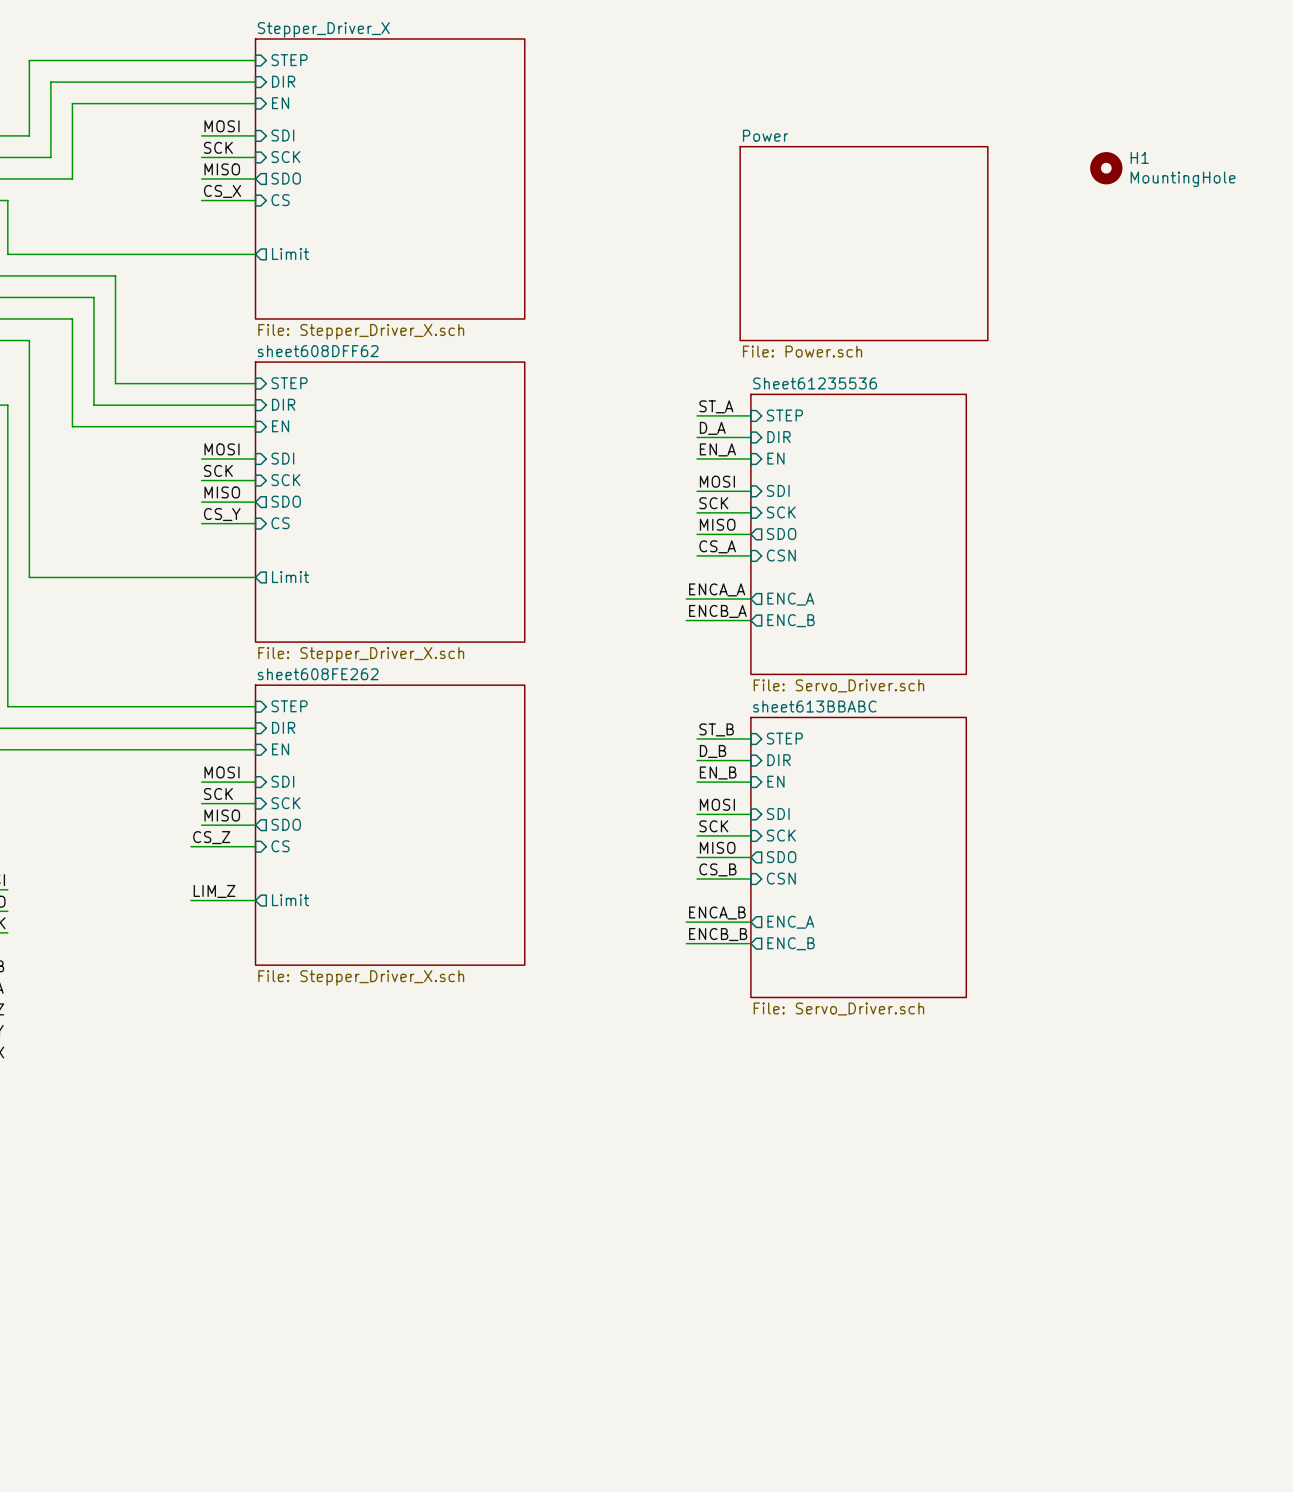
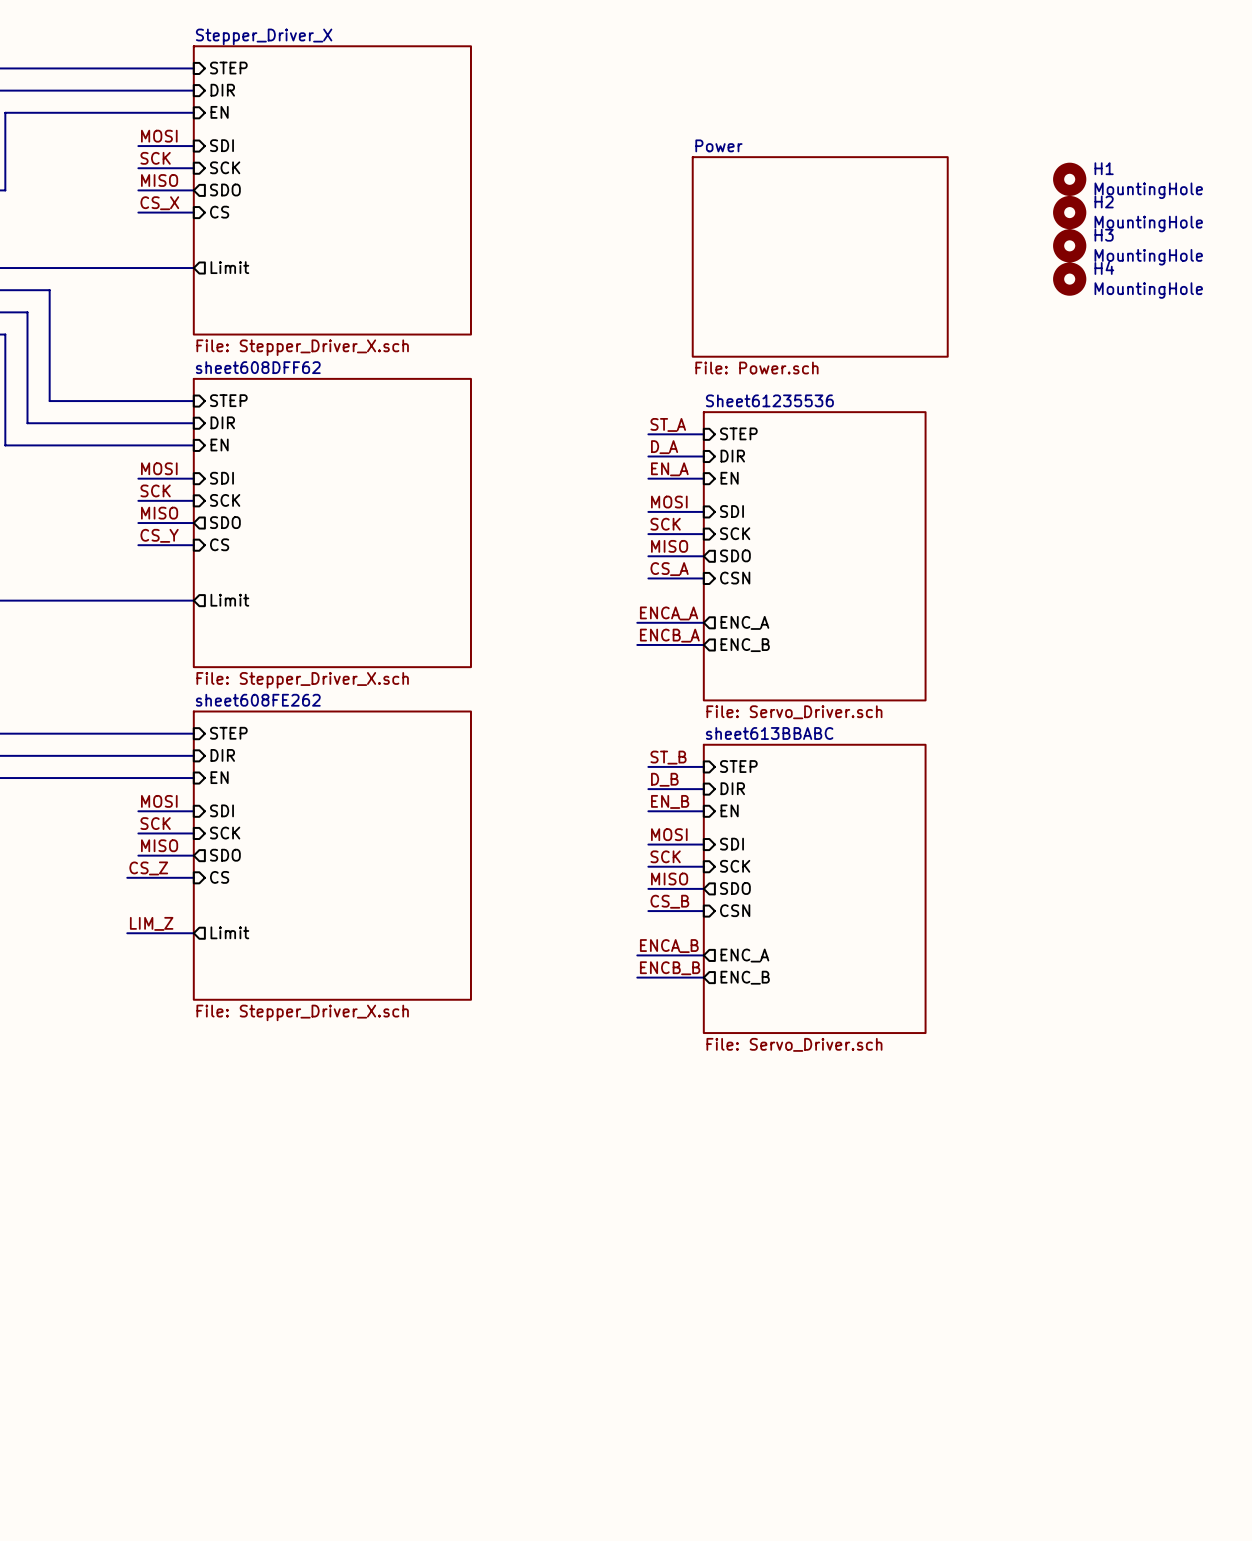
H2: none -> MountingHole (1069, 212)
H3: none -> MountingHole (1069, 245)
H4: none -> MountingHole (1069, 279)

